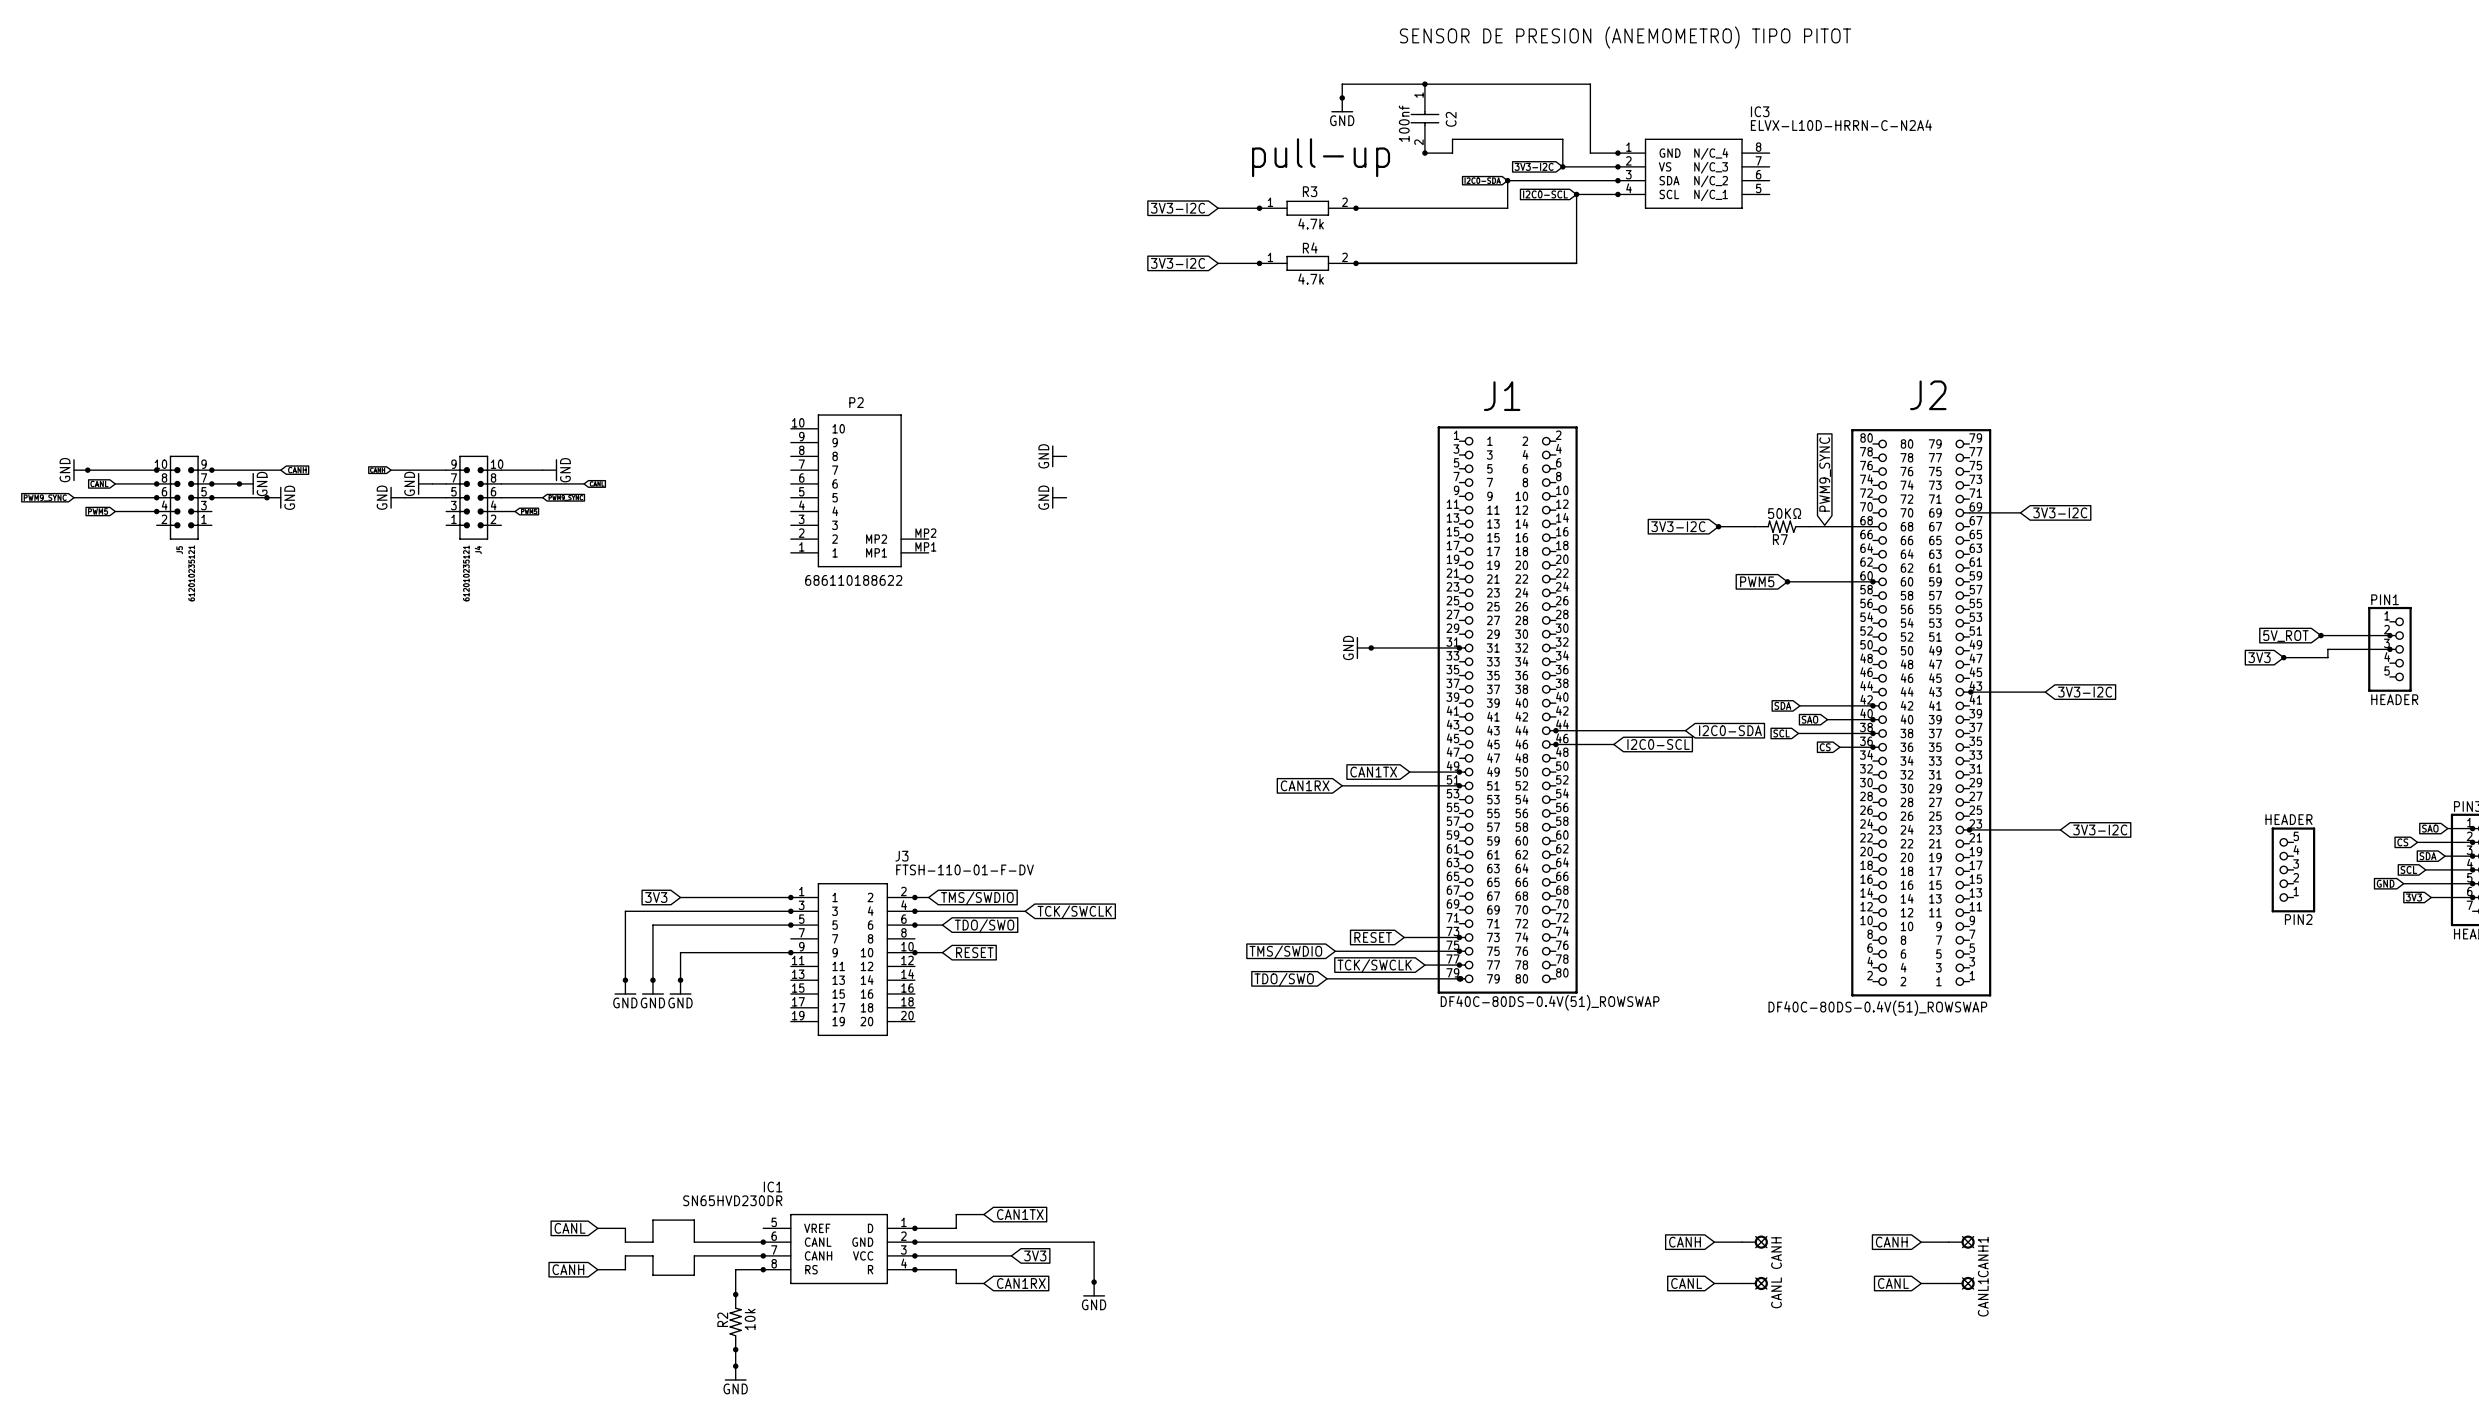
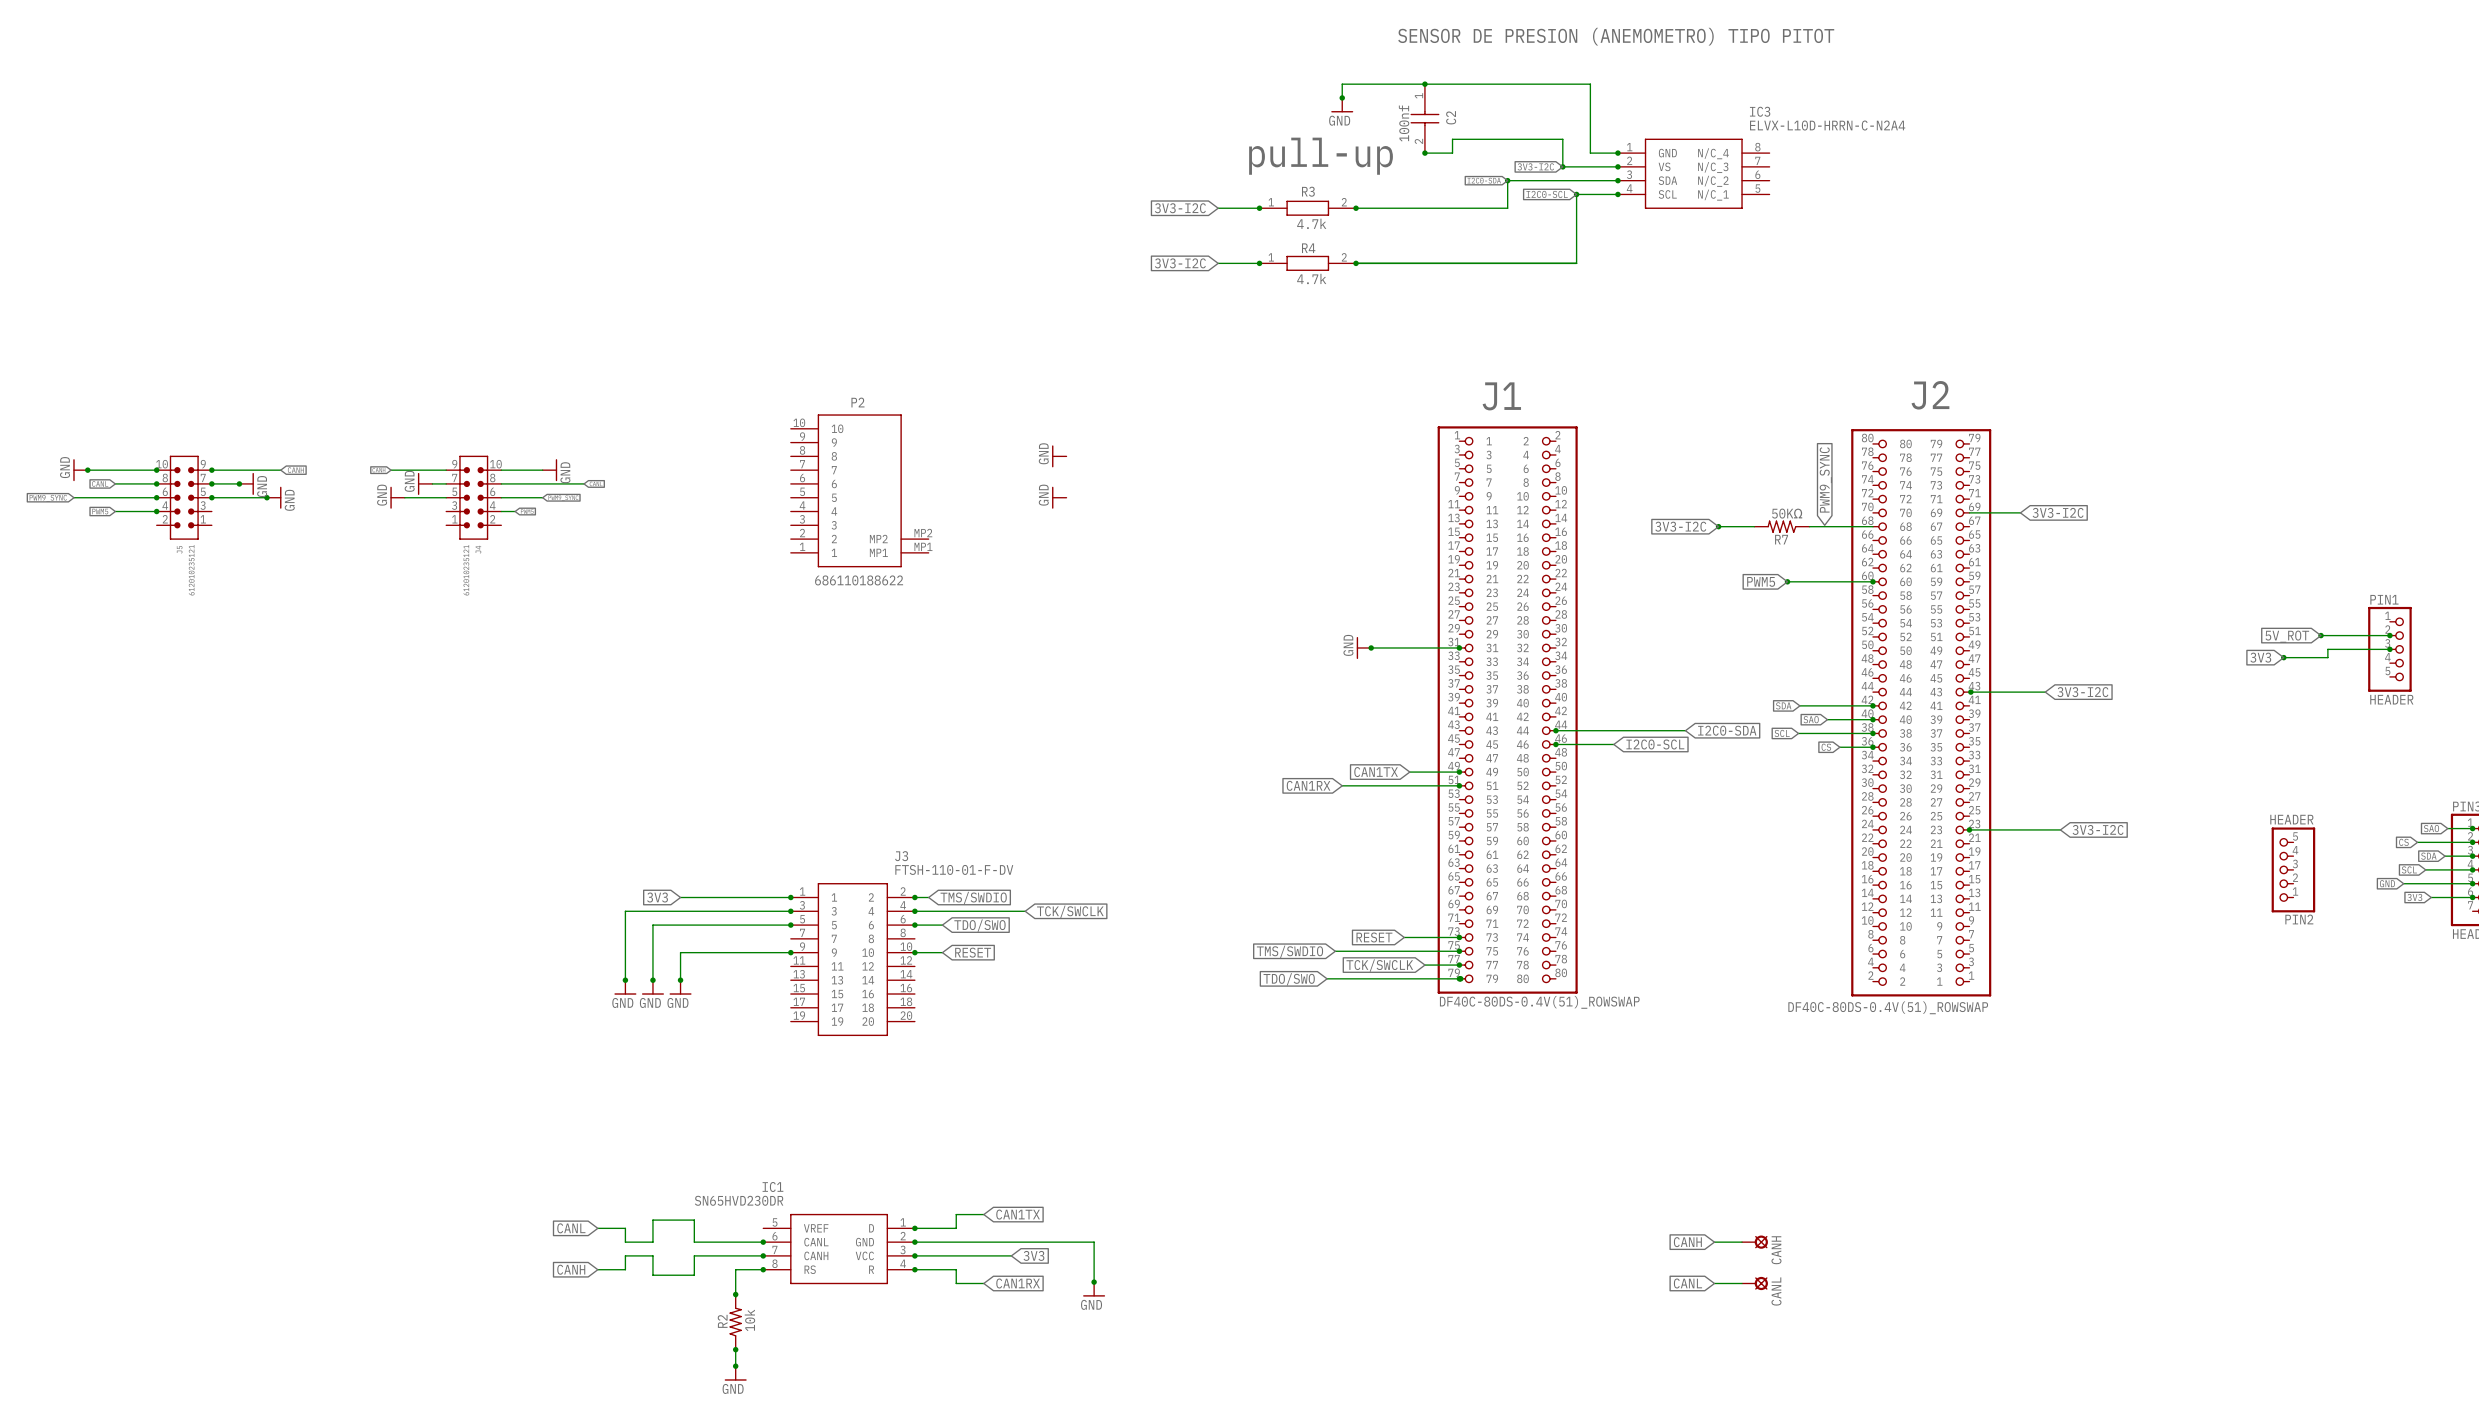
global label: CANH (1891, 1242) -> none
wire: (1921, 1242) (1948, 1242) -> none
CANH1: (1961, 1242) -> none
global label: CANL (1893, 1283) -> none
wire: (1921, 1283) (1948, 1283) -> none
CANL1: (1961, 1283) -> none

